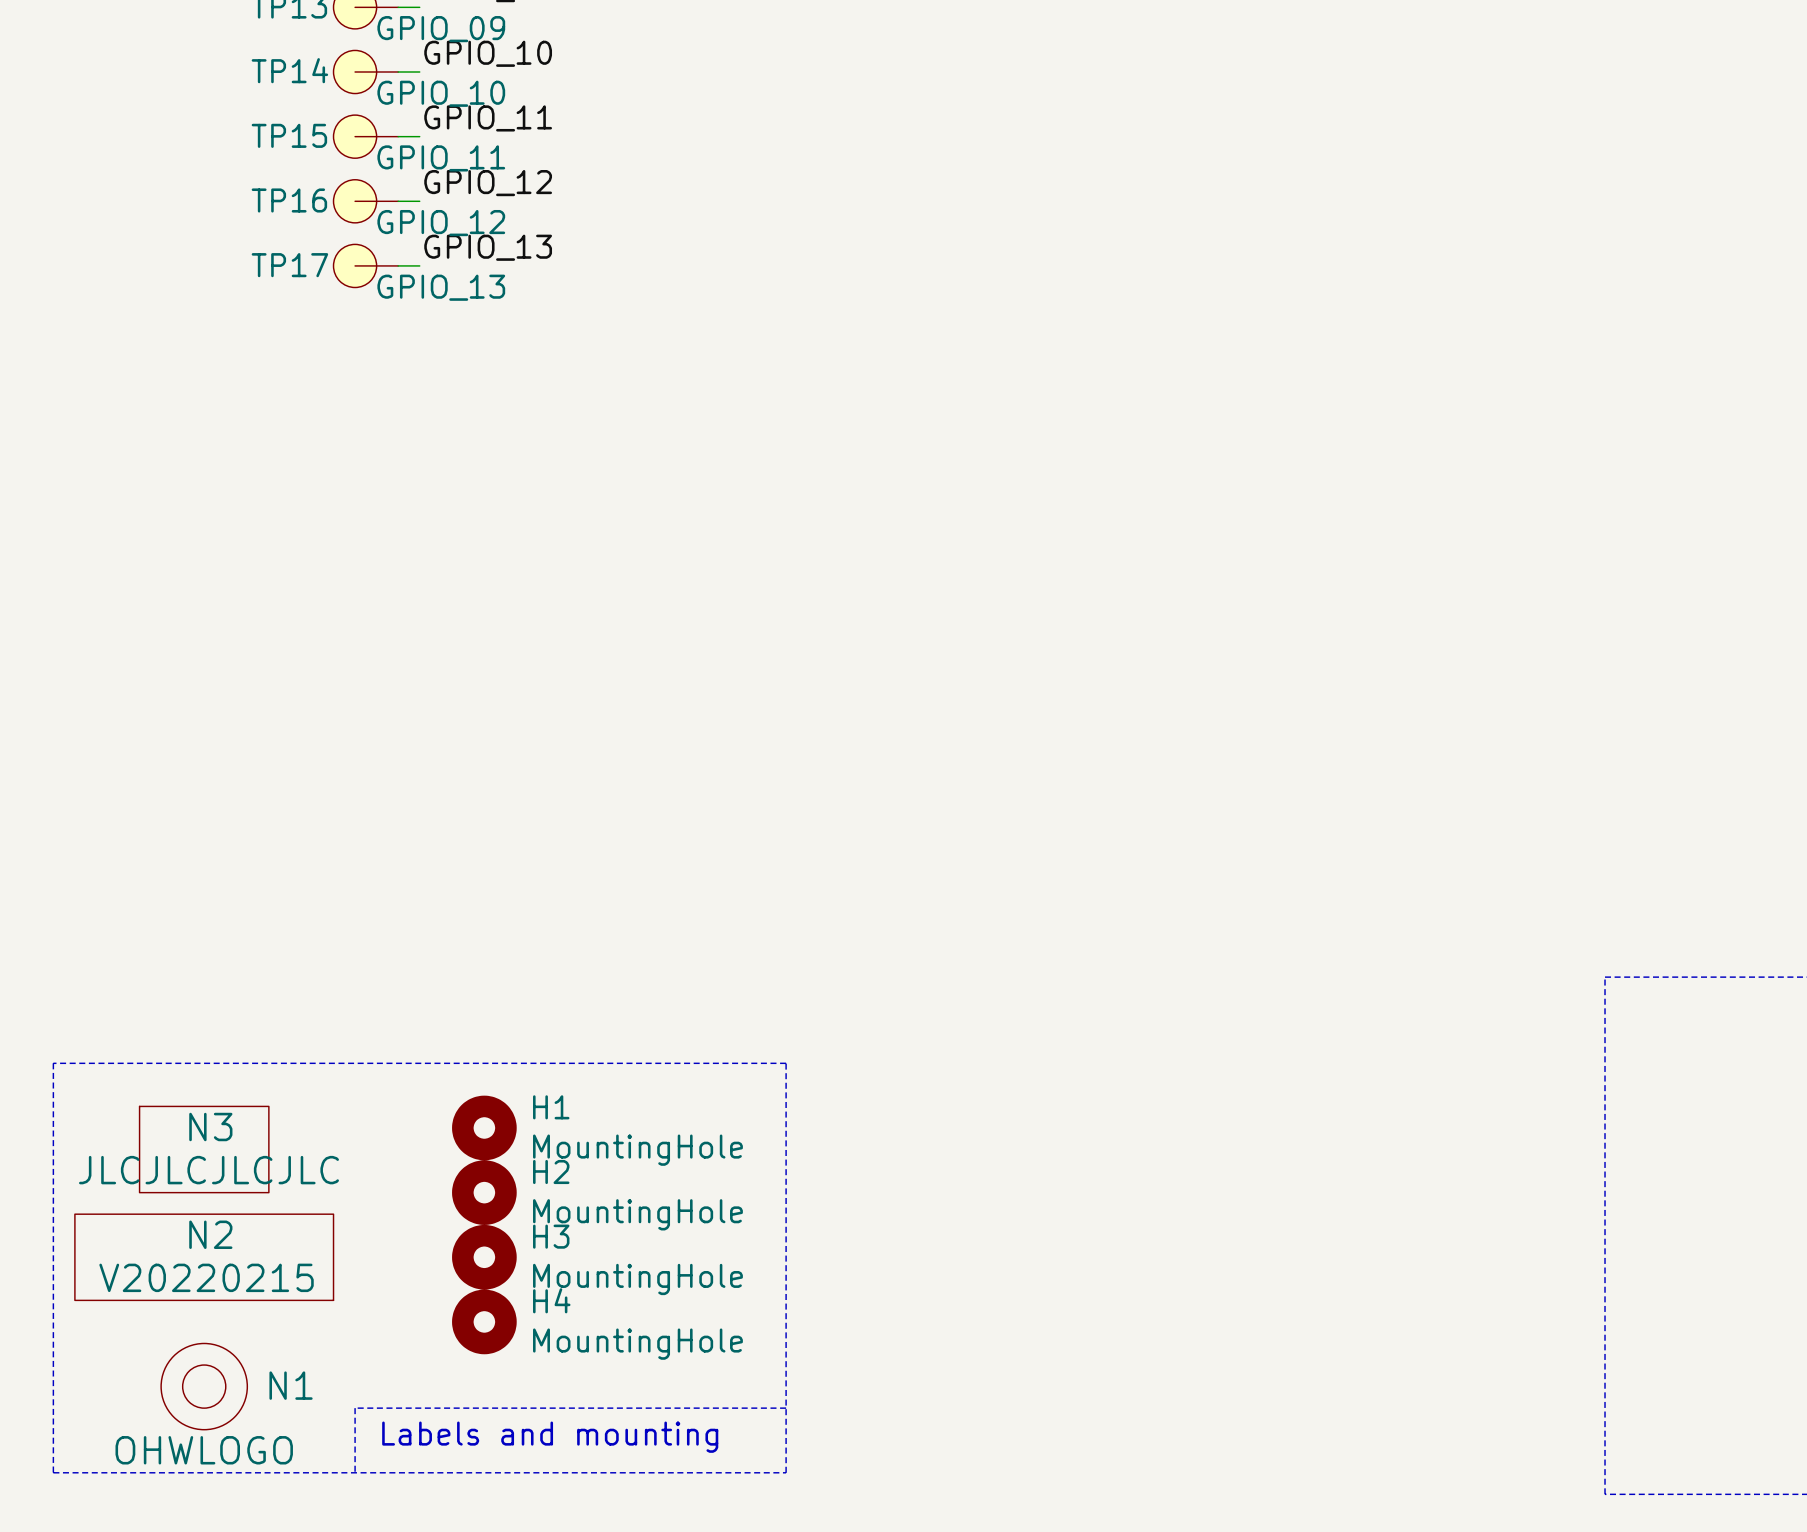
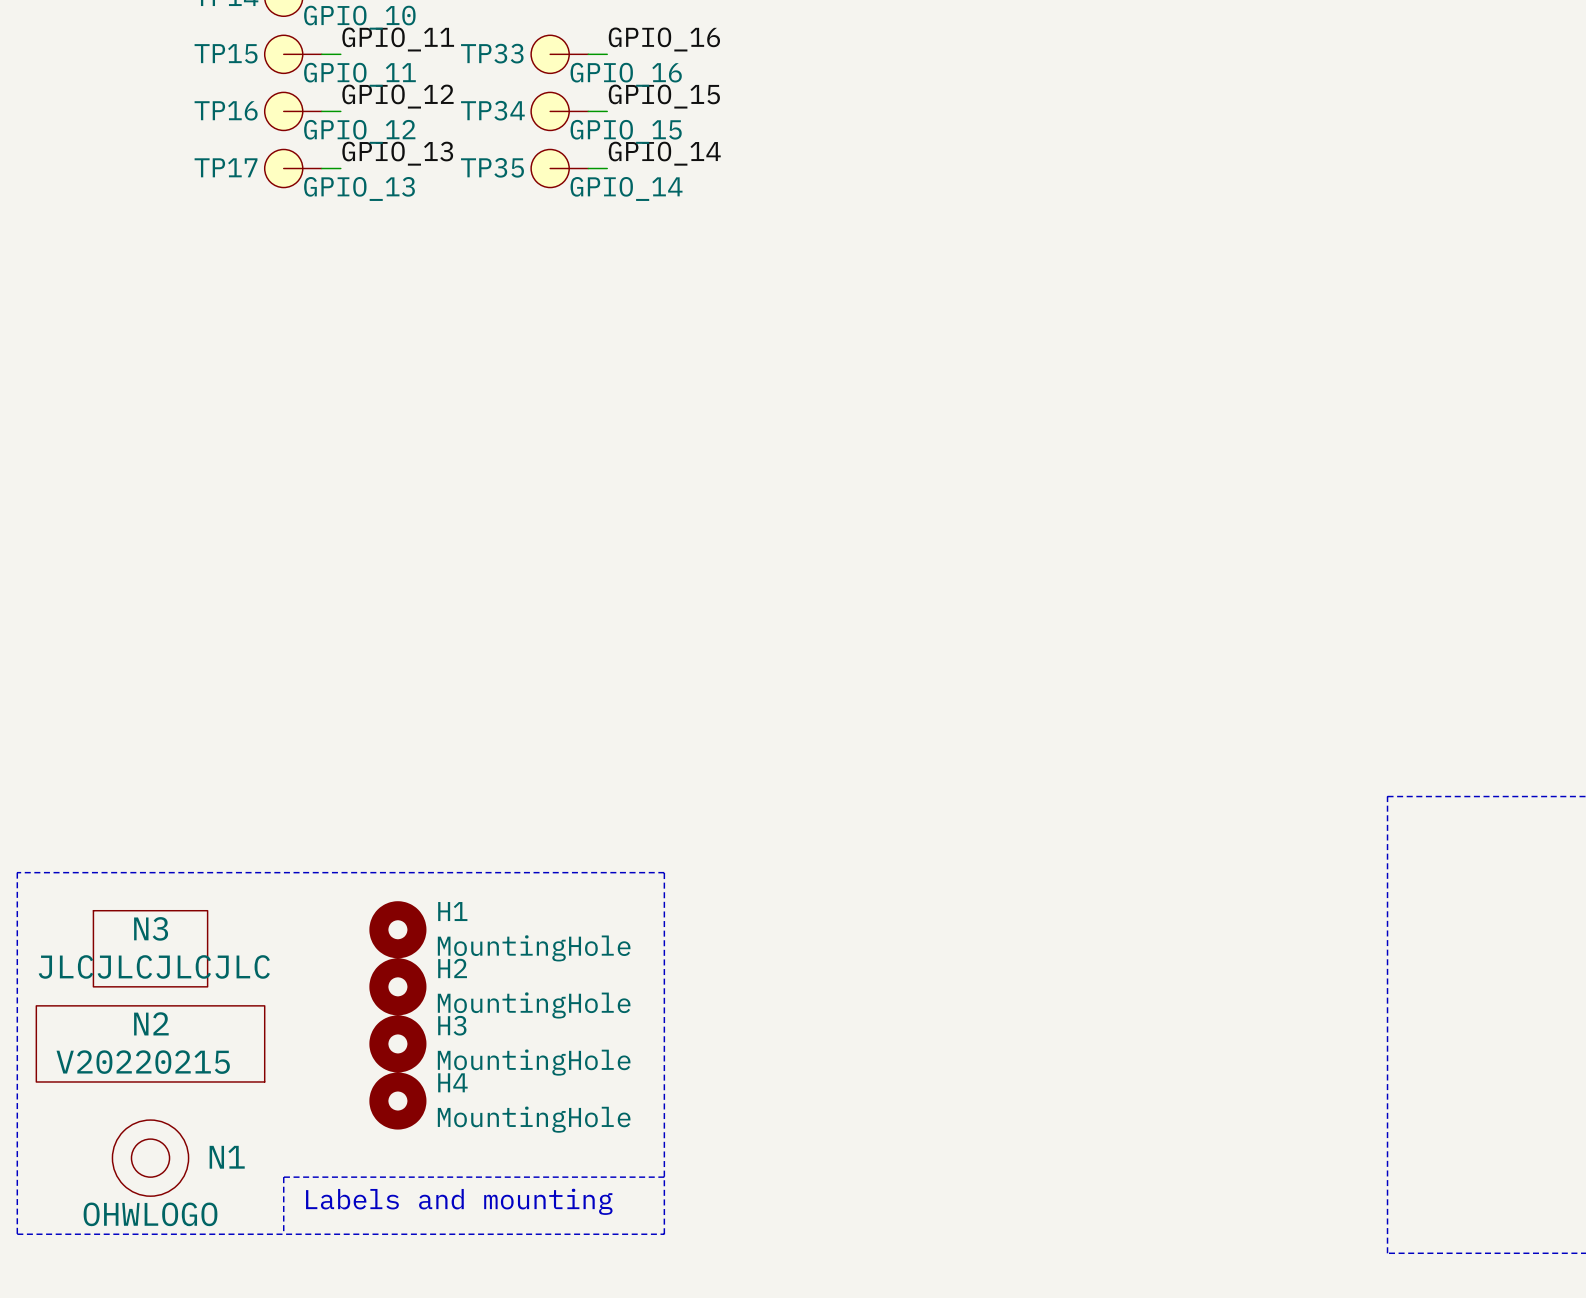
label: none -> GPIO_16 (664, 39)
TP33: none -> GPIO_16 (559, 54)
wire: none -> (588, 54) (607, 54)
label: none -> GPIO_15 (664, 96)
TP34: none -> GPIO_15 (559, 111)
wire: none -> (588, 111) (607, 111)
label: none -> GPIO_14 (664, 153)
TP35: none -> GPIO_14 (559, 168)
wire: none -> (588, 168) (607, 168)

